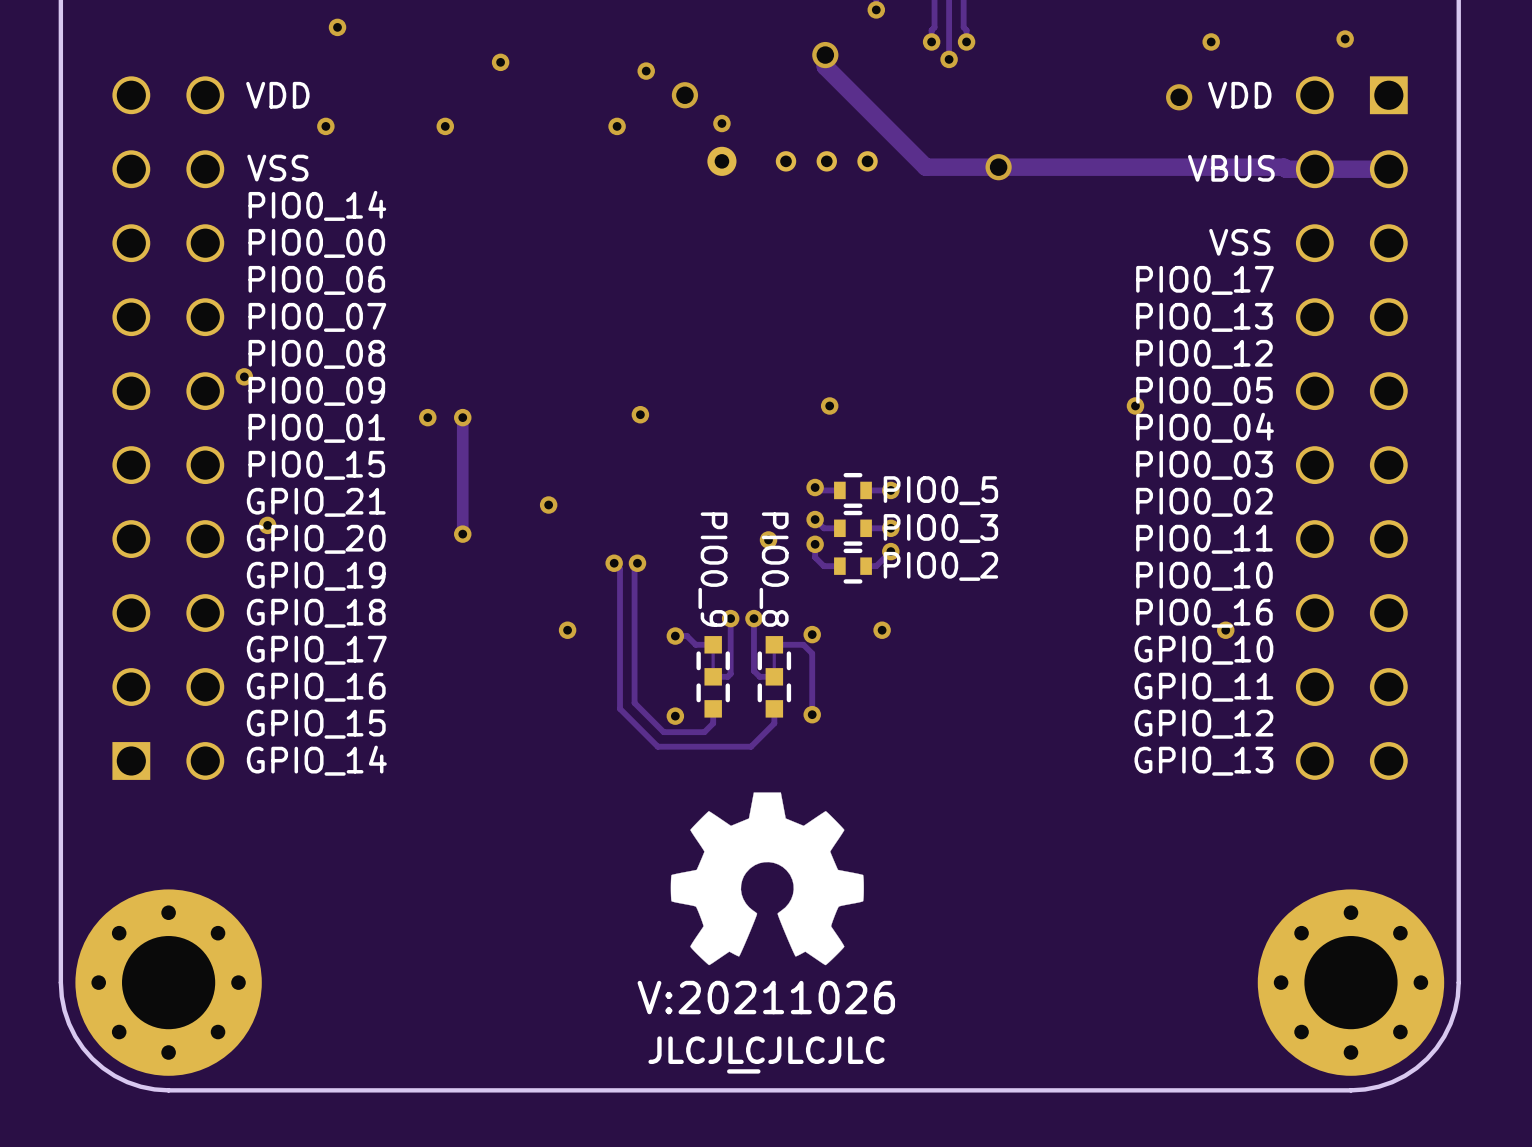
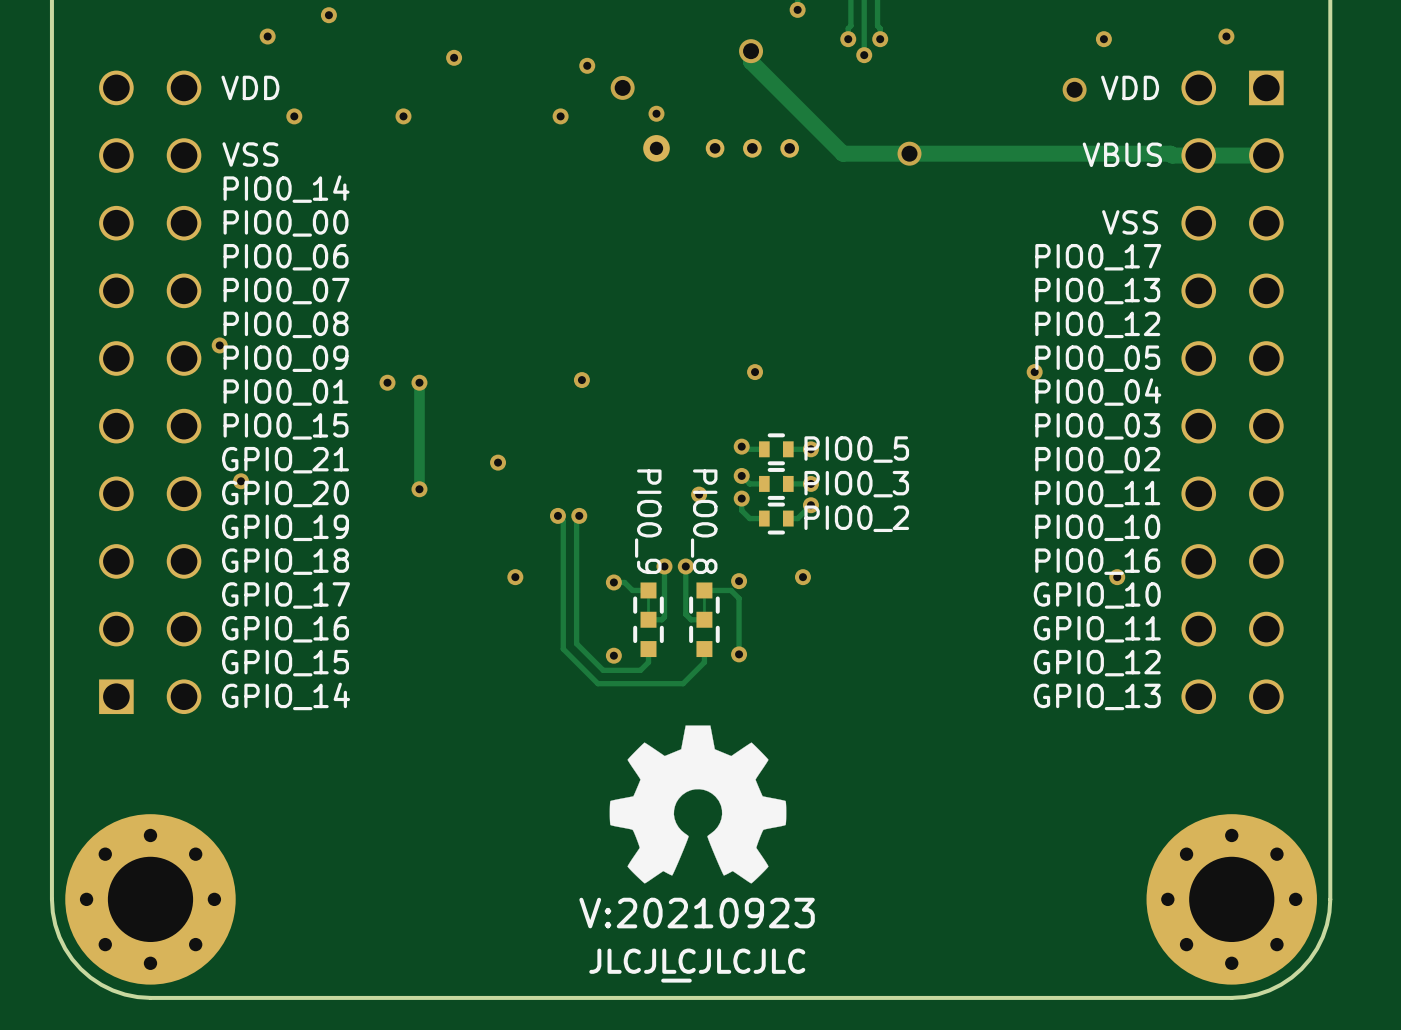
via: none -> (328, 15)
via: (337, 27) -> none
via: none -> (267, 36)
drawing shape: [637, 980, 896, 1015] -> [579, 897, 815, 929]

